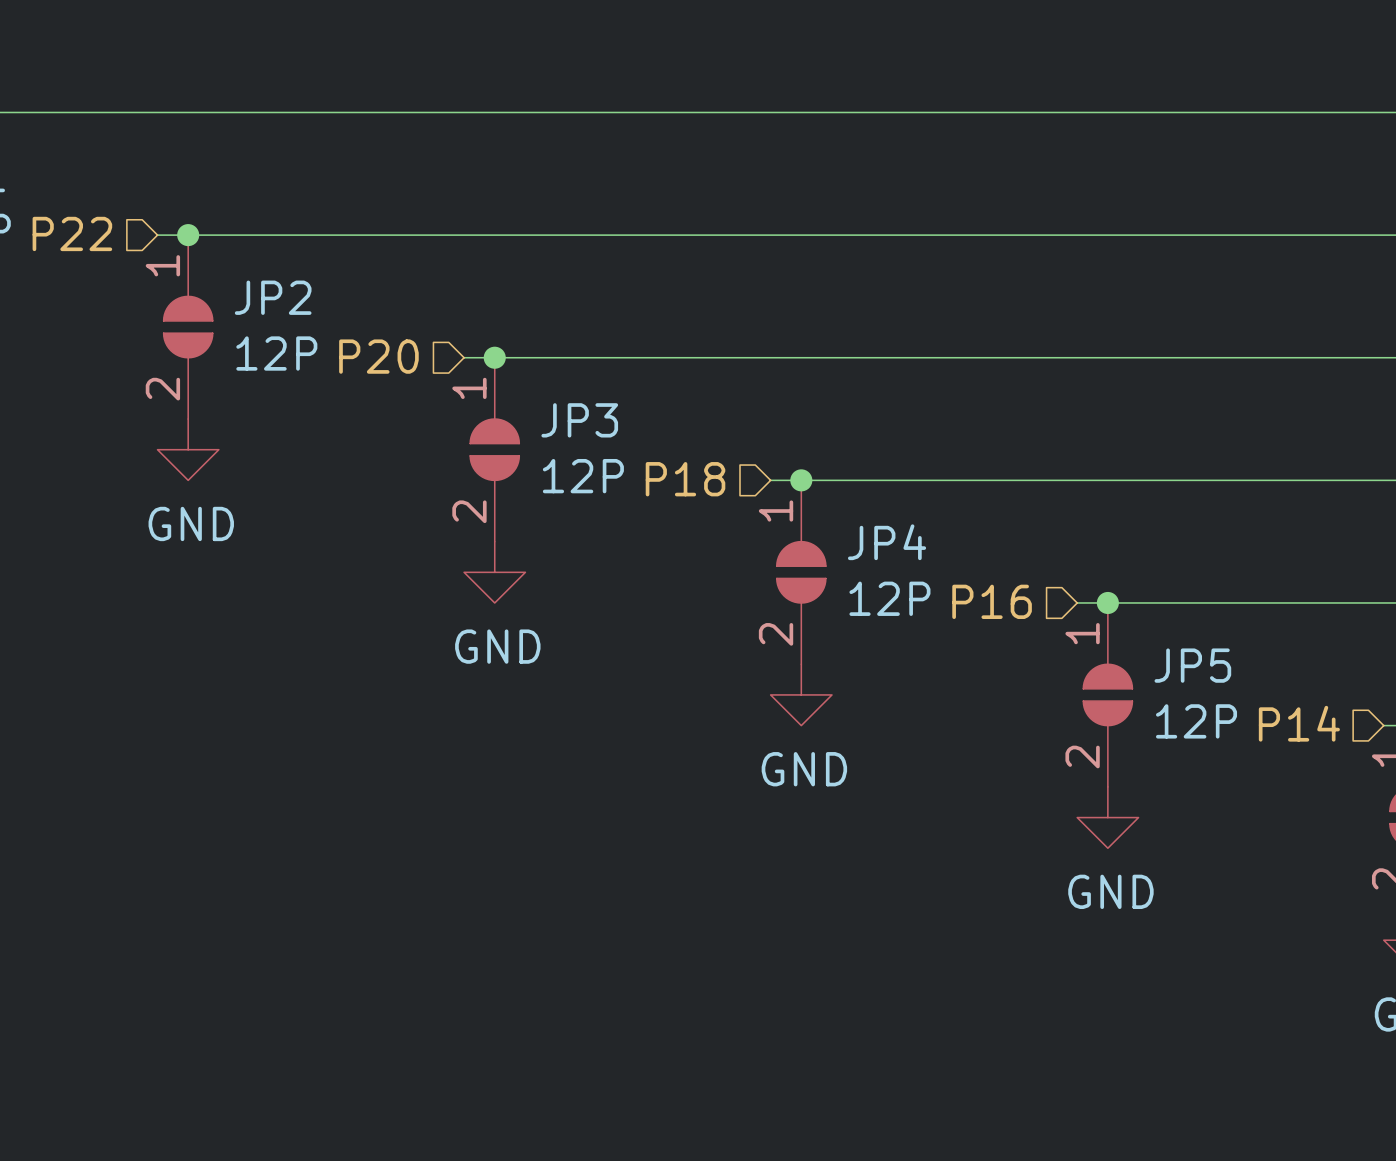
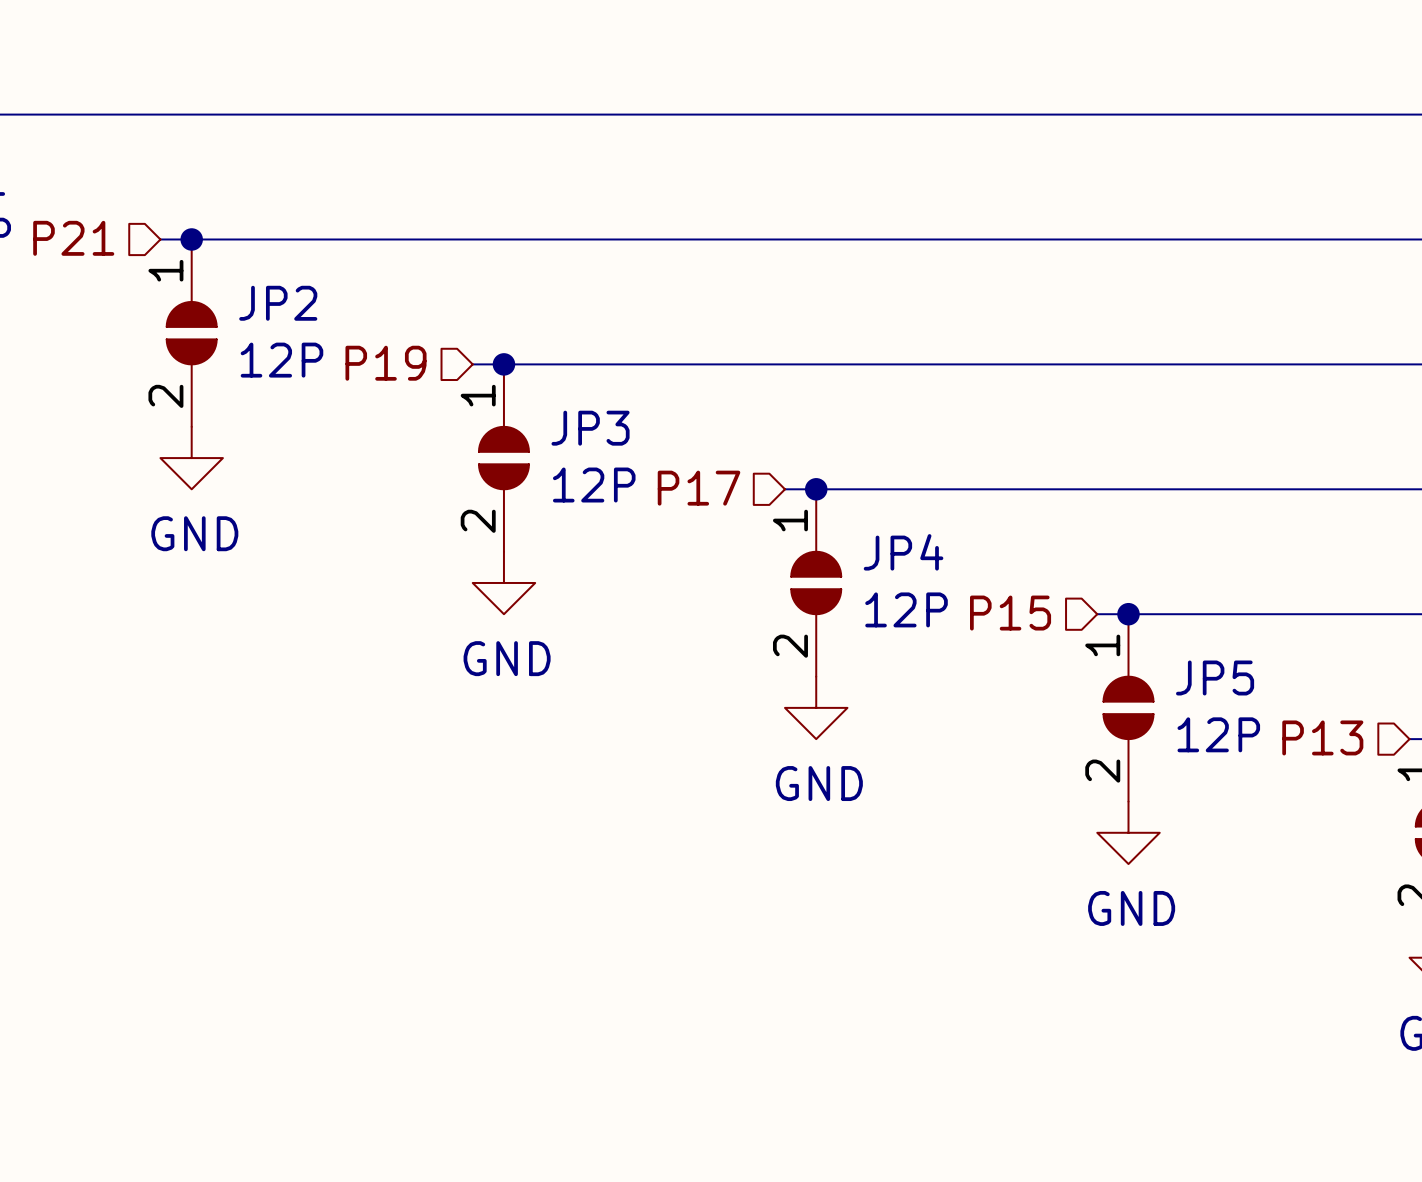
hierarchical label: P22 (72, 233) -> P21 (73, 238)
hierarchical label: P20 (378, 356) -> P19 (386, 363)
hierarchical label: P18 (685, 479) -> P17 (699, 488)
hierarchical label: P16 (992, 601) -> P15 (1010, 613)
hierarchical label: P14 (1299, 723) -> P13 (1322, 737)

